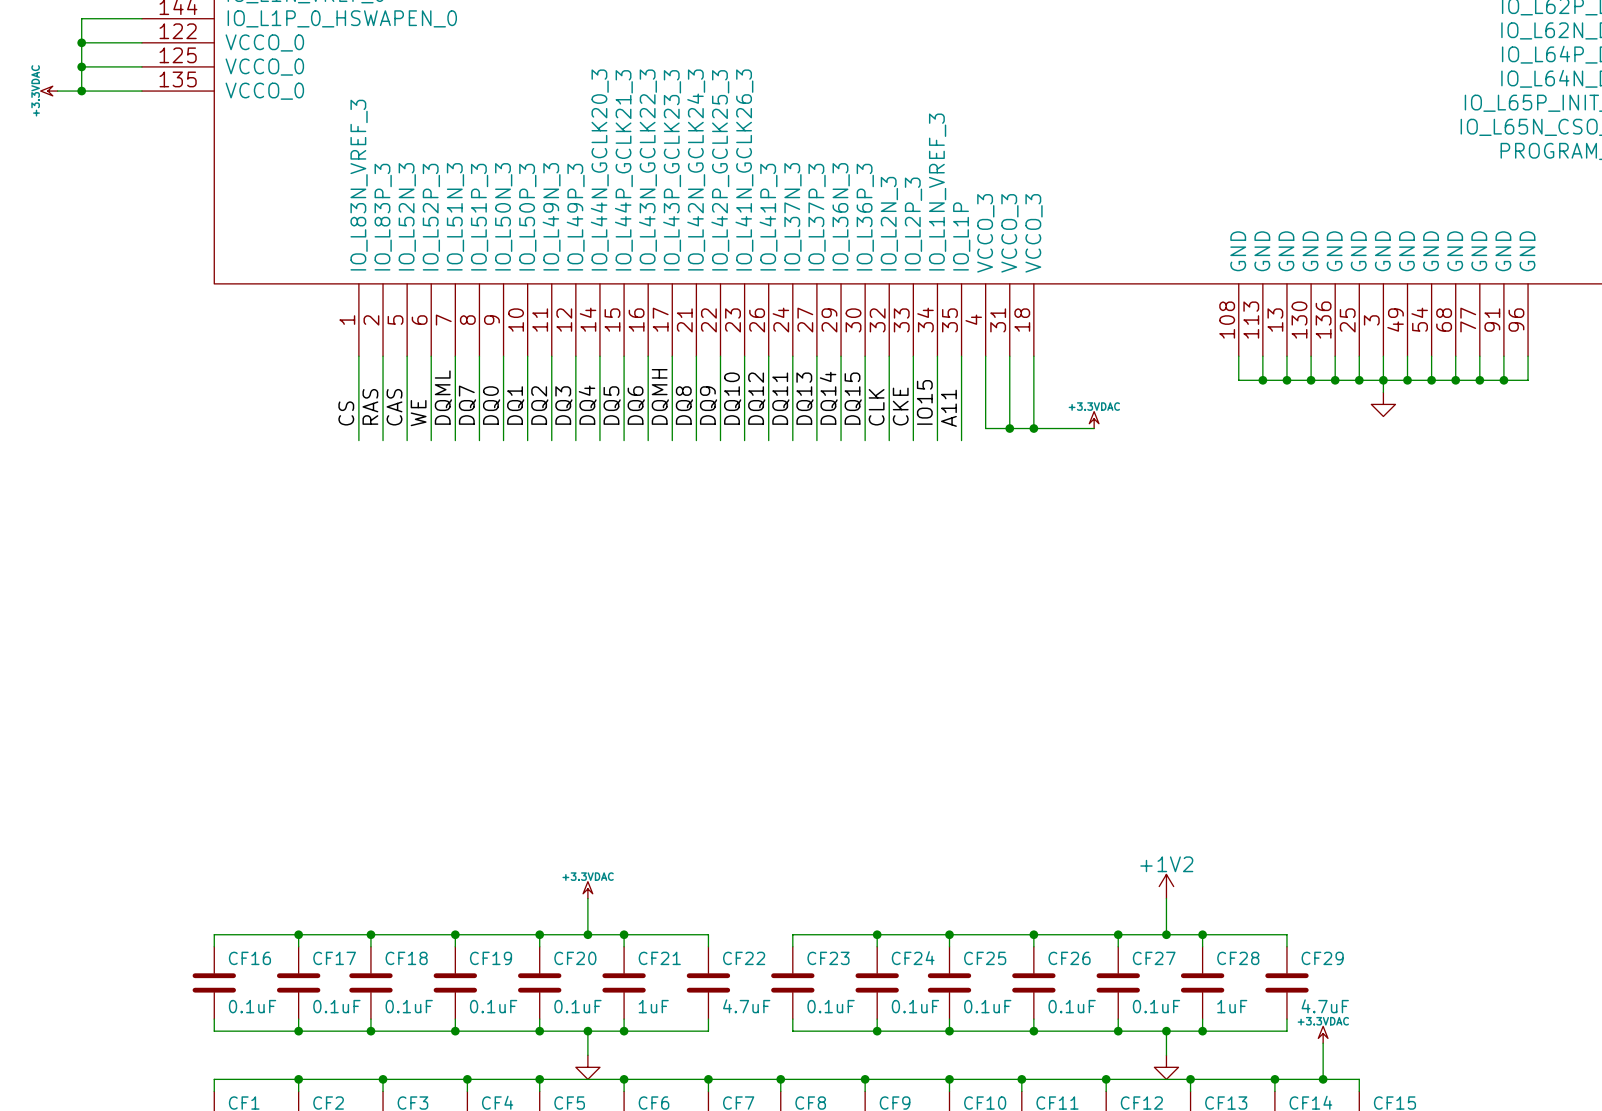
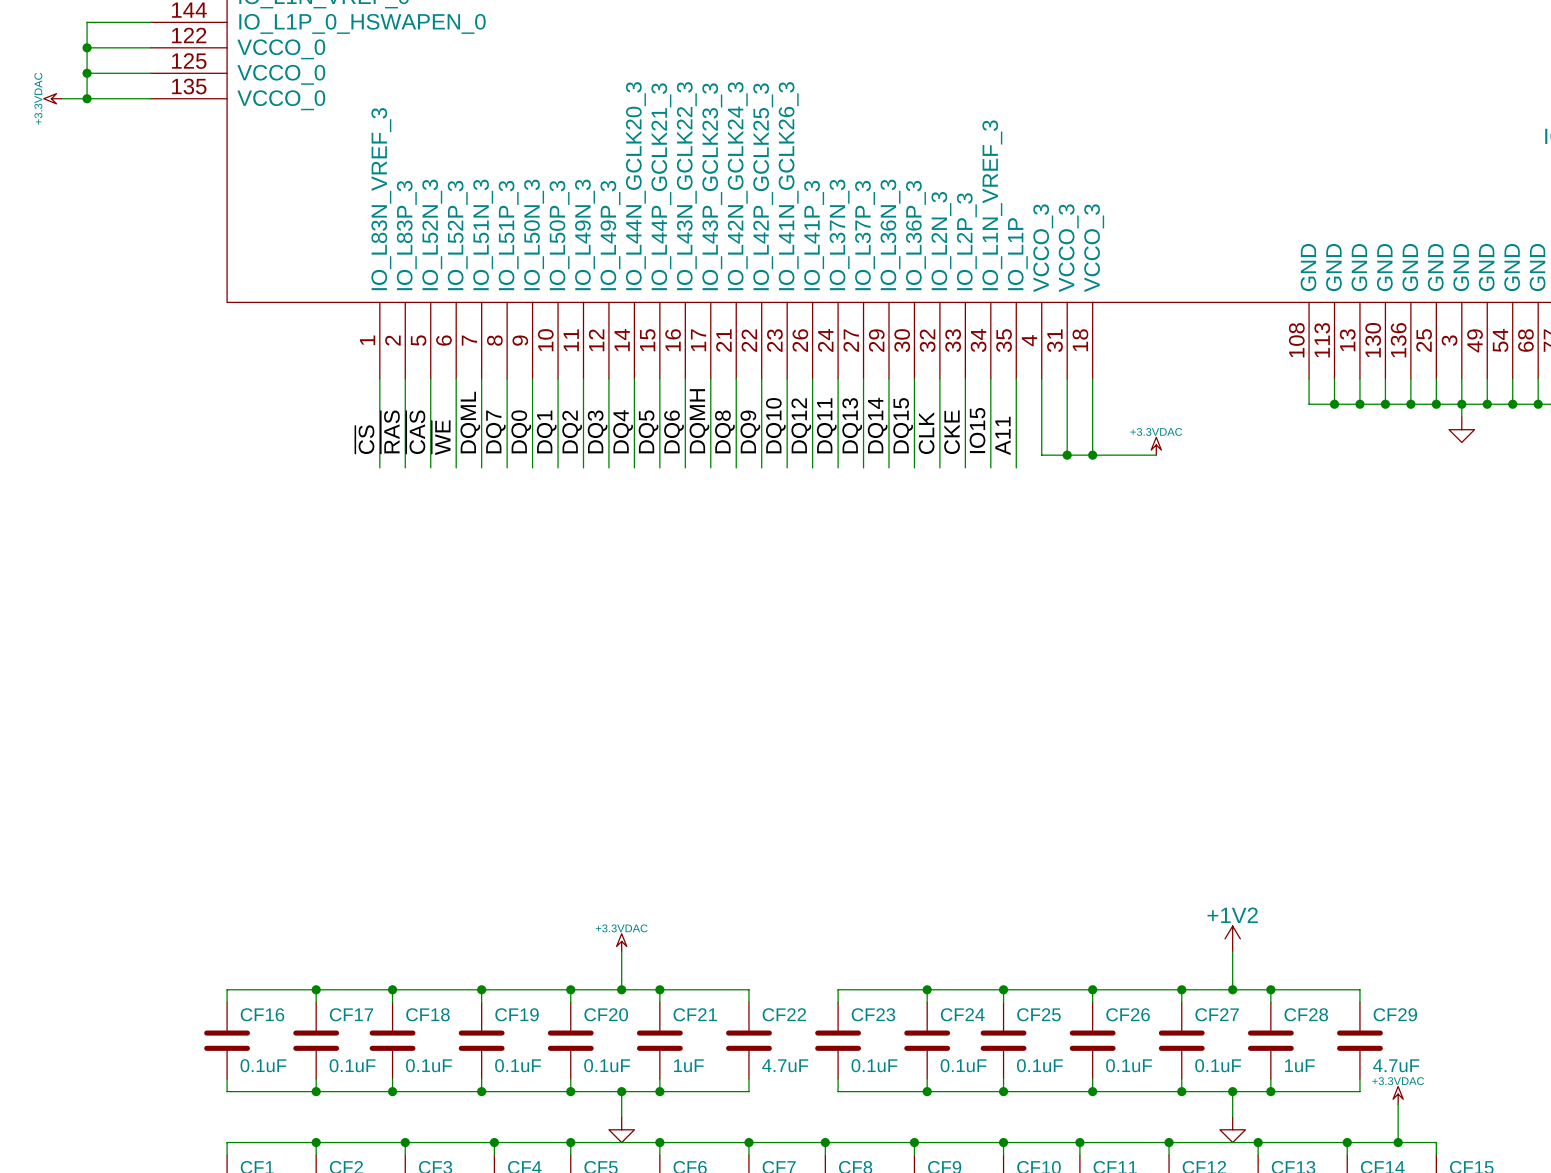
label: RAS (370, 406) -> ~{RAS} (390, 432)
label: CAS (394, 407) -> ~{CAS} (415, 432)
label: CS (346, 413) -> ~{CS} (364, 439)
label: WE (418, 413) -> ~{WE} (441, 437)

